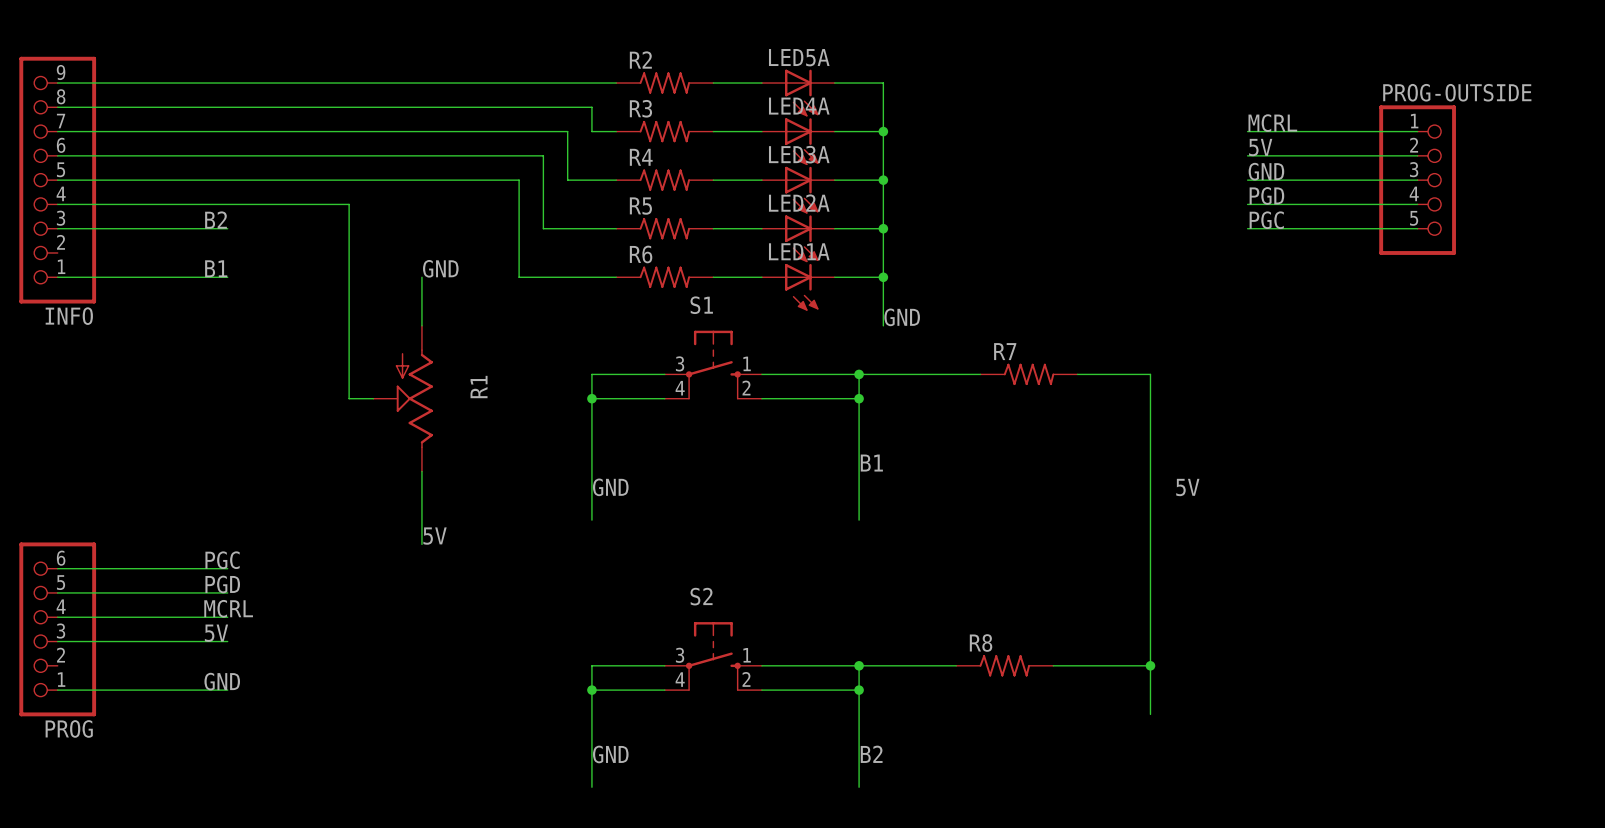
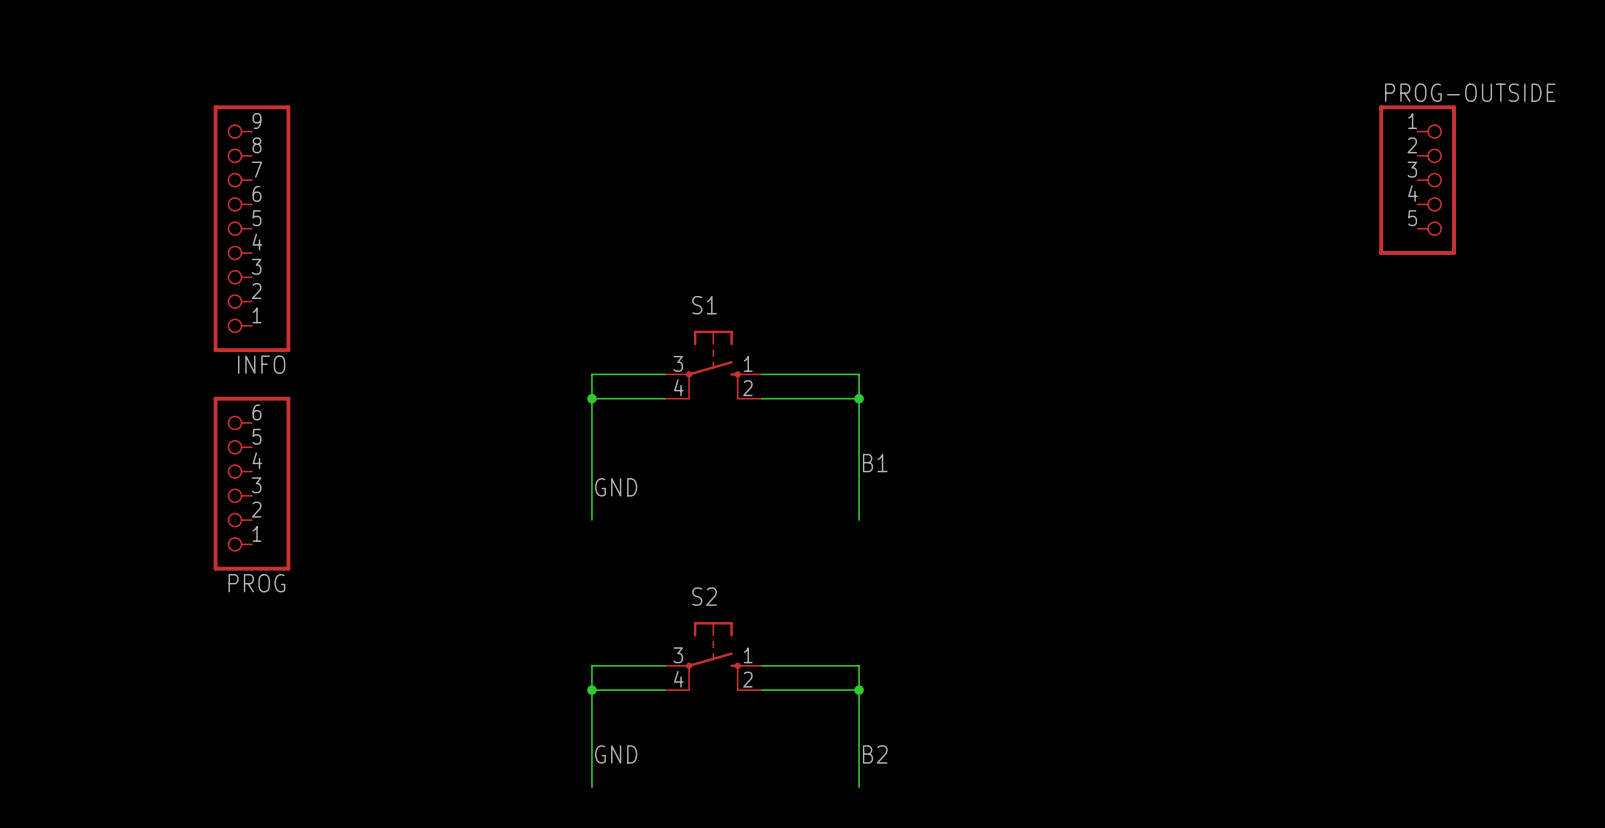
wire: (57, 83) (616, 83) -> none
R2: (664, 83) -> none
wire: (713, 83) (761, 83) -> none
wire: (834, 83) (883, 83) (883, 325) -> none
LED5A: (798, 93) -> none
wire: (57, 107) (591, 107) (591, 131) (616, 131) -> none
label: MCRL (1272, 123) -> none
wire: (57, 131) (567, 131) (567, 180) (616, 180) -> none
R3: (664, 131) -> none
wire: (713, 131) (761, 131) -> none
wire: (834, 131) (883, 131) -> none
junction: (883, 131) -> none
wire: (1247, 131) (1417, 131) -> none
LED4A: (798, 141) -> none
label: 5V (1260, 147) -> none
wire: (57, 155) (543, 155) (543, 228) (616, 228) -> none
wire: (1247, 155) (1417, 155) -> none
label: GND (1266, 171) -> none
wire: (57, 180) (519, 180) (519, 277) (616, 277) -> none
INFO position: (57, 180) -> (251, 228)
R4: (664, 180) -> none
wire: (713, 180) (761, 180) -> none
wire: (834, 180) (883, 180) -> none
junction: (883, 180) -> none
wire: (1247, 180) (1417, 180) -> none
LED3A: (798, 190) -> none
label: PGD (1266, 195) -> none
wire: (57, 204) (349, 204) (349, 398) (373, 398) -> none
wire: (1247, 204) (1417, 204) -> none
label: B2 (216, 220) -> none
label: PGC (1266, 220) -> none
wire: (57, 228) (227, 228) -> none
R5: (664, 228) -> none
wire: (713, 228) (761, 228) -> none
wire: (834, 228) (883, 228) -> none
junction: (883, 228) -> none
wire: (1247, 228) (1417, 228) -> none
LED2A: (798, 238) -> none
label: B1 (216, 268) -> none
label: GND (440, 268) -> none
wire: (57, 277) (227, 277) -> none
wire: (421, 277) (421, 325) -> none
R6: (664, 277) -> none
wire: (713, 277) (761, 277) -> none
wire: (834, 277) (883, 277) -> none
junction: (883, 277) -> none
LED1A: (798, 287) -> none
label: GND (902, 317) -> none
wire: (859, 374) (980, 374) -> none
junction: (859, 374) -> none
R7: (1029, 374) -> none
wire: (1077, 374) (1150, 374) (1150, 714) -> none
R1: (403, 398) -> none
wire: (421, 471) (421, 544) -> none
PROG: none -> (251, 483)
label: 5V (1187, 487) -> none
label: 5V (435, 536) -> none
label: PGC (222, 560) -> none
wire: (57, 568) (227, 568) -> none
label: PGD (222, 584) -> none
wire: (57, 592) (227, 592) -> none
label: MCRL (228, 608) -> none
wire: (57, 617) (227, 617) -> none
PROG: (57, 629) -> none
label: 5V (216, 633) -> none
wire: (57, 641) (227, 641) -> none
wire: (859, 665) (956, 665) -> none
junction: (859, 665) -> none
R8: (1004, 665) -> none
wire: (1053, 665) (1150, 665) -> none
junction: (1150, 665) -> none
label: GND (222, 681) -> none
wire: (57, 690) (227, 690) -> none

